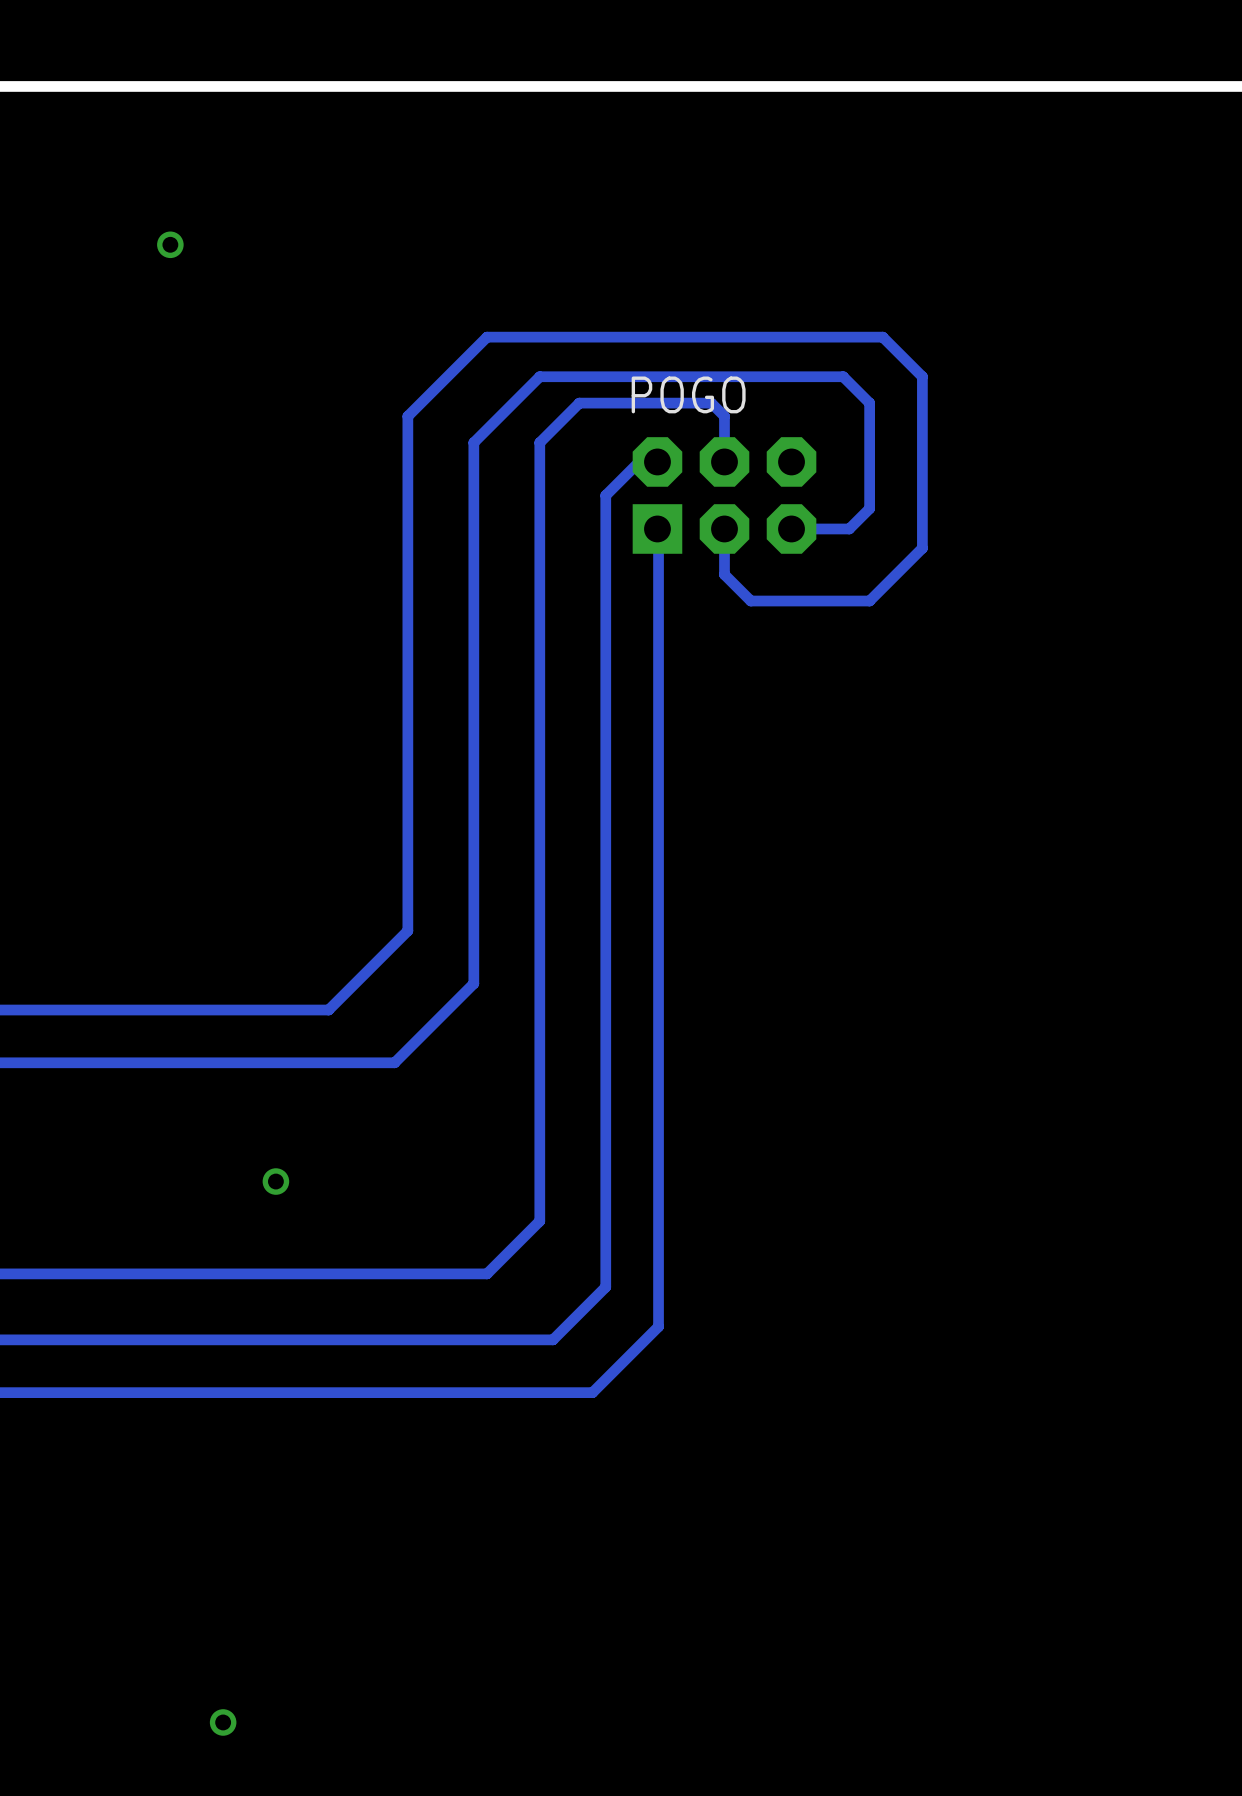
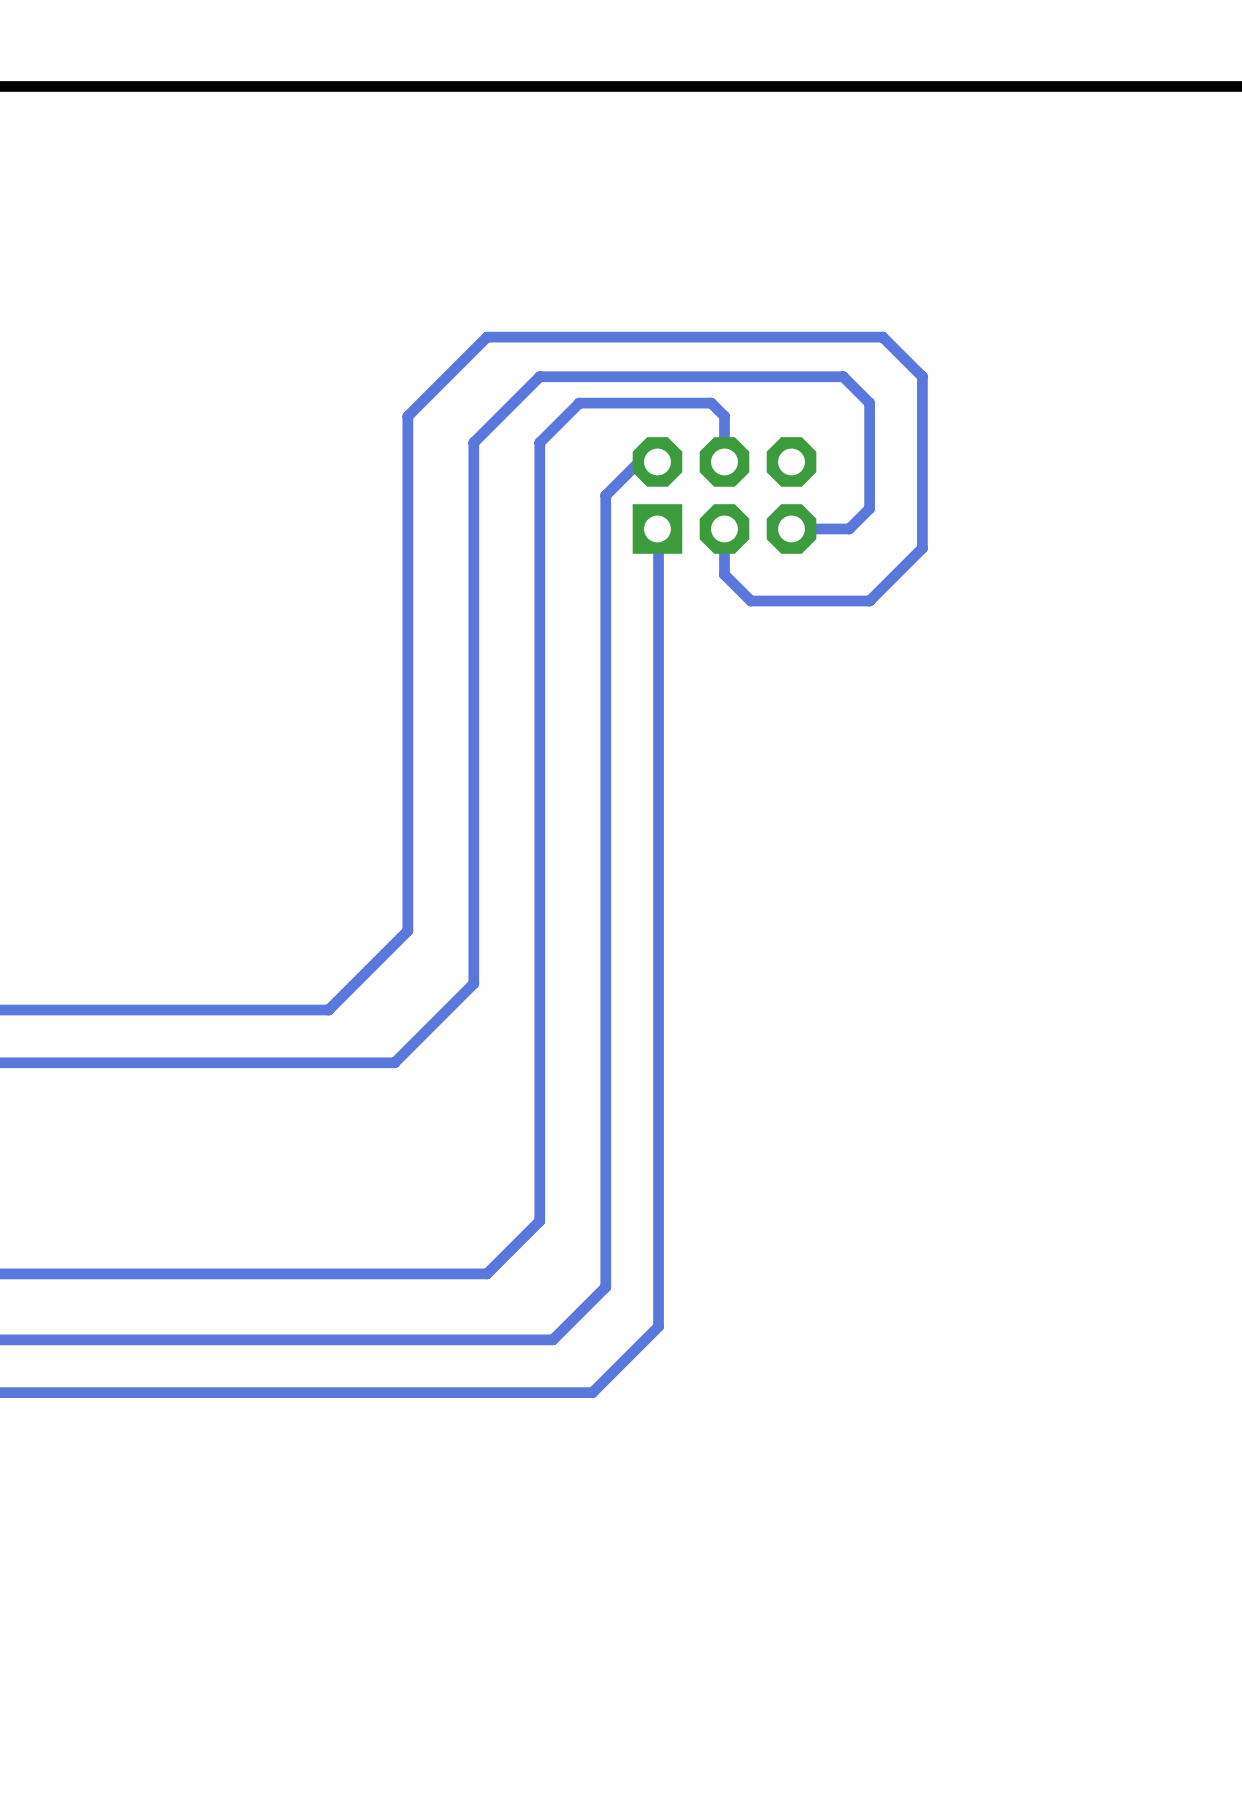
via: (170, 244) -> none
POGO name: POGO (688, 394) -> none
via: (275, 1181) -> none
via: (223, 1722) -> none

